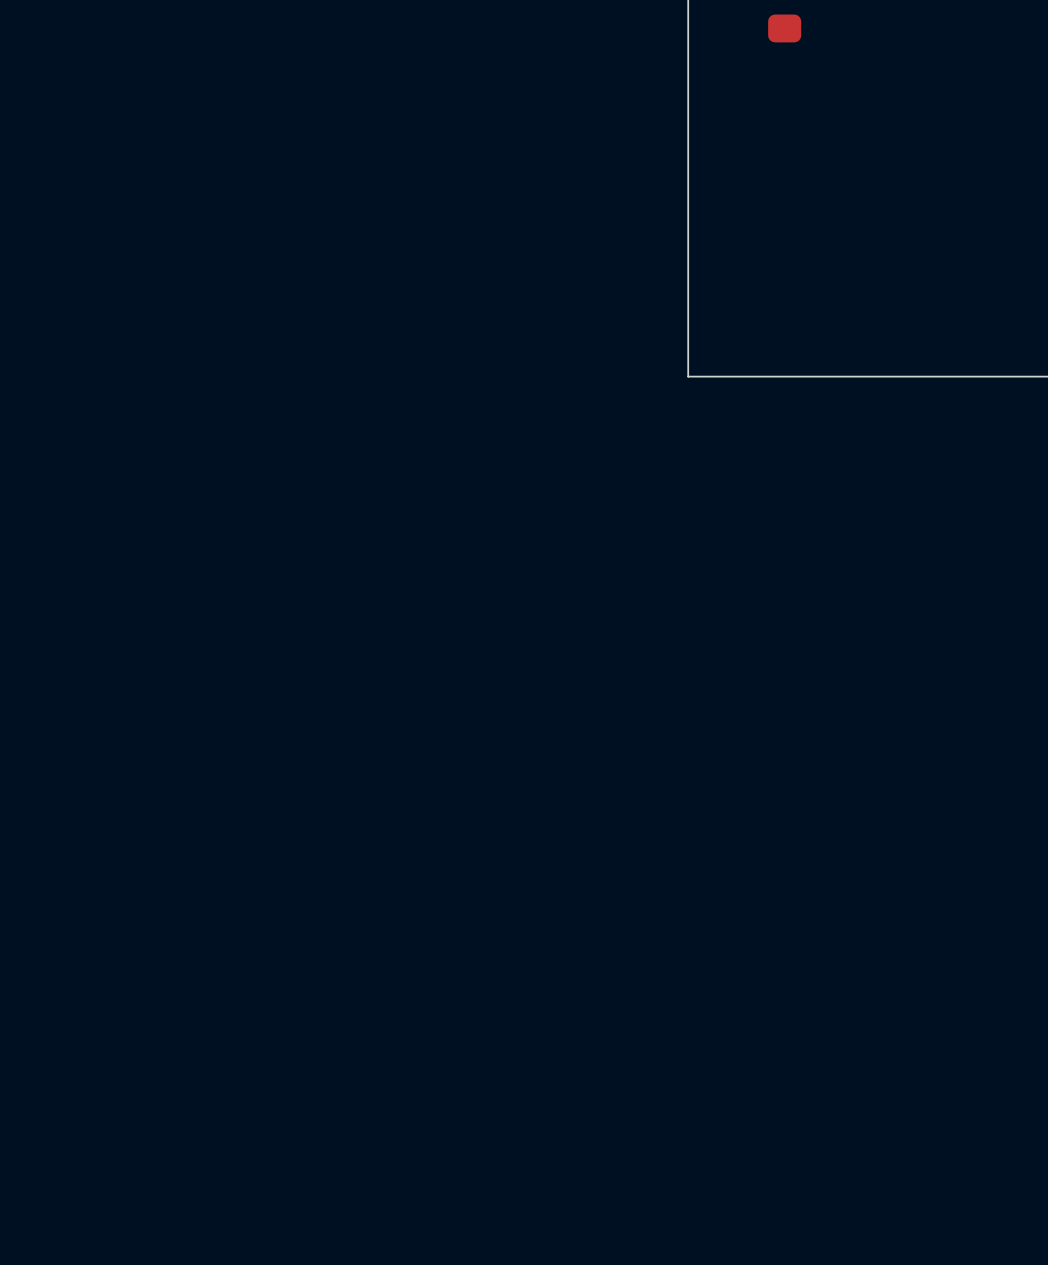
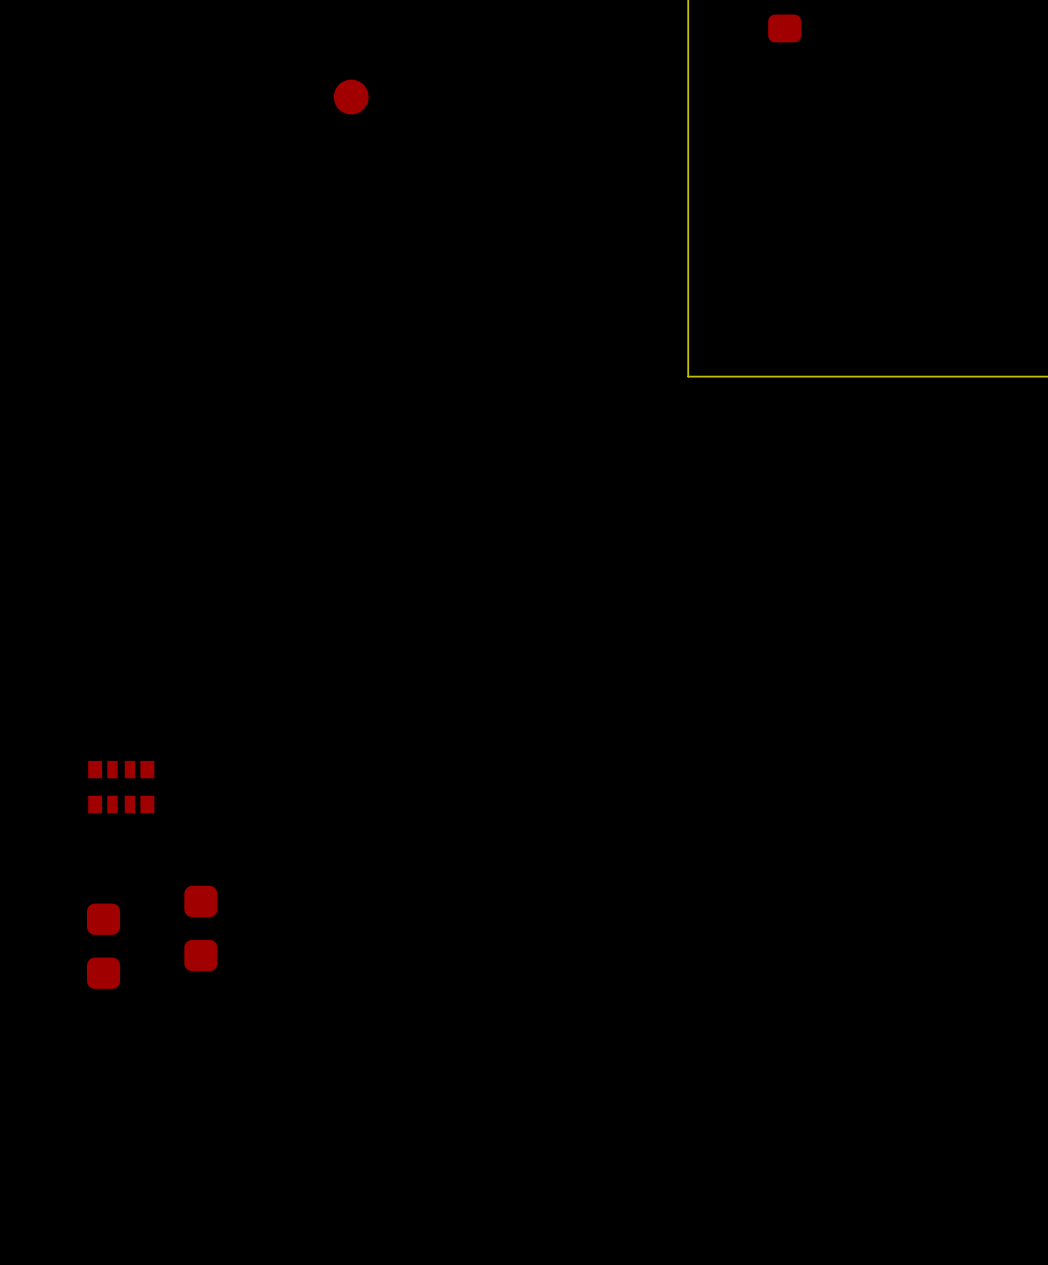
part: none -> (351, 97)
part: none -> (121, 787)
part: none -> (200, 928)
part: none -> (103, 946)

